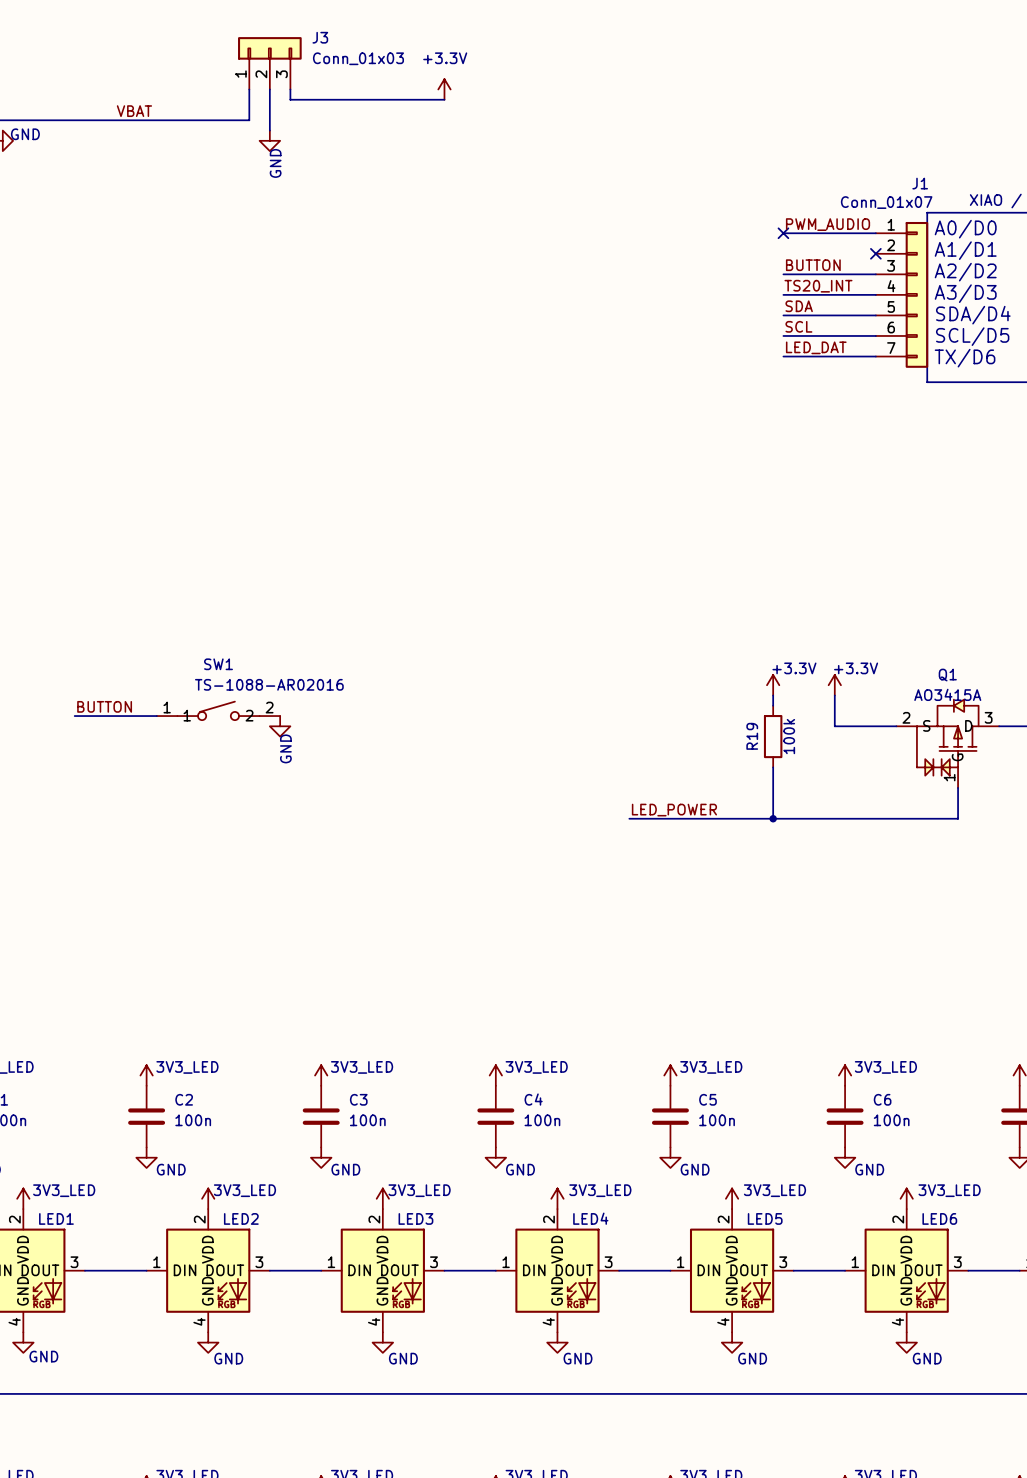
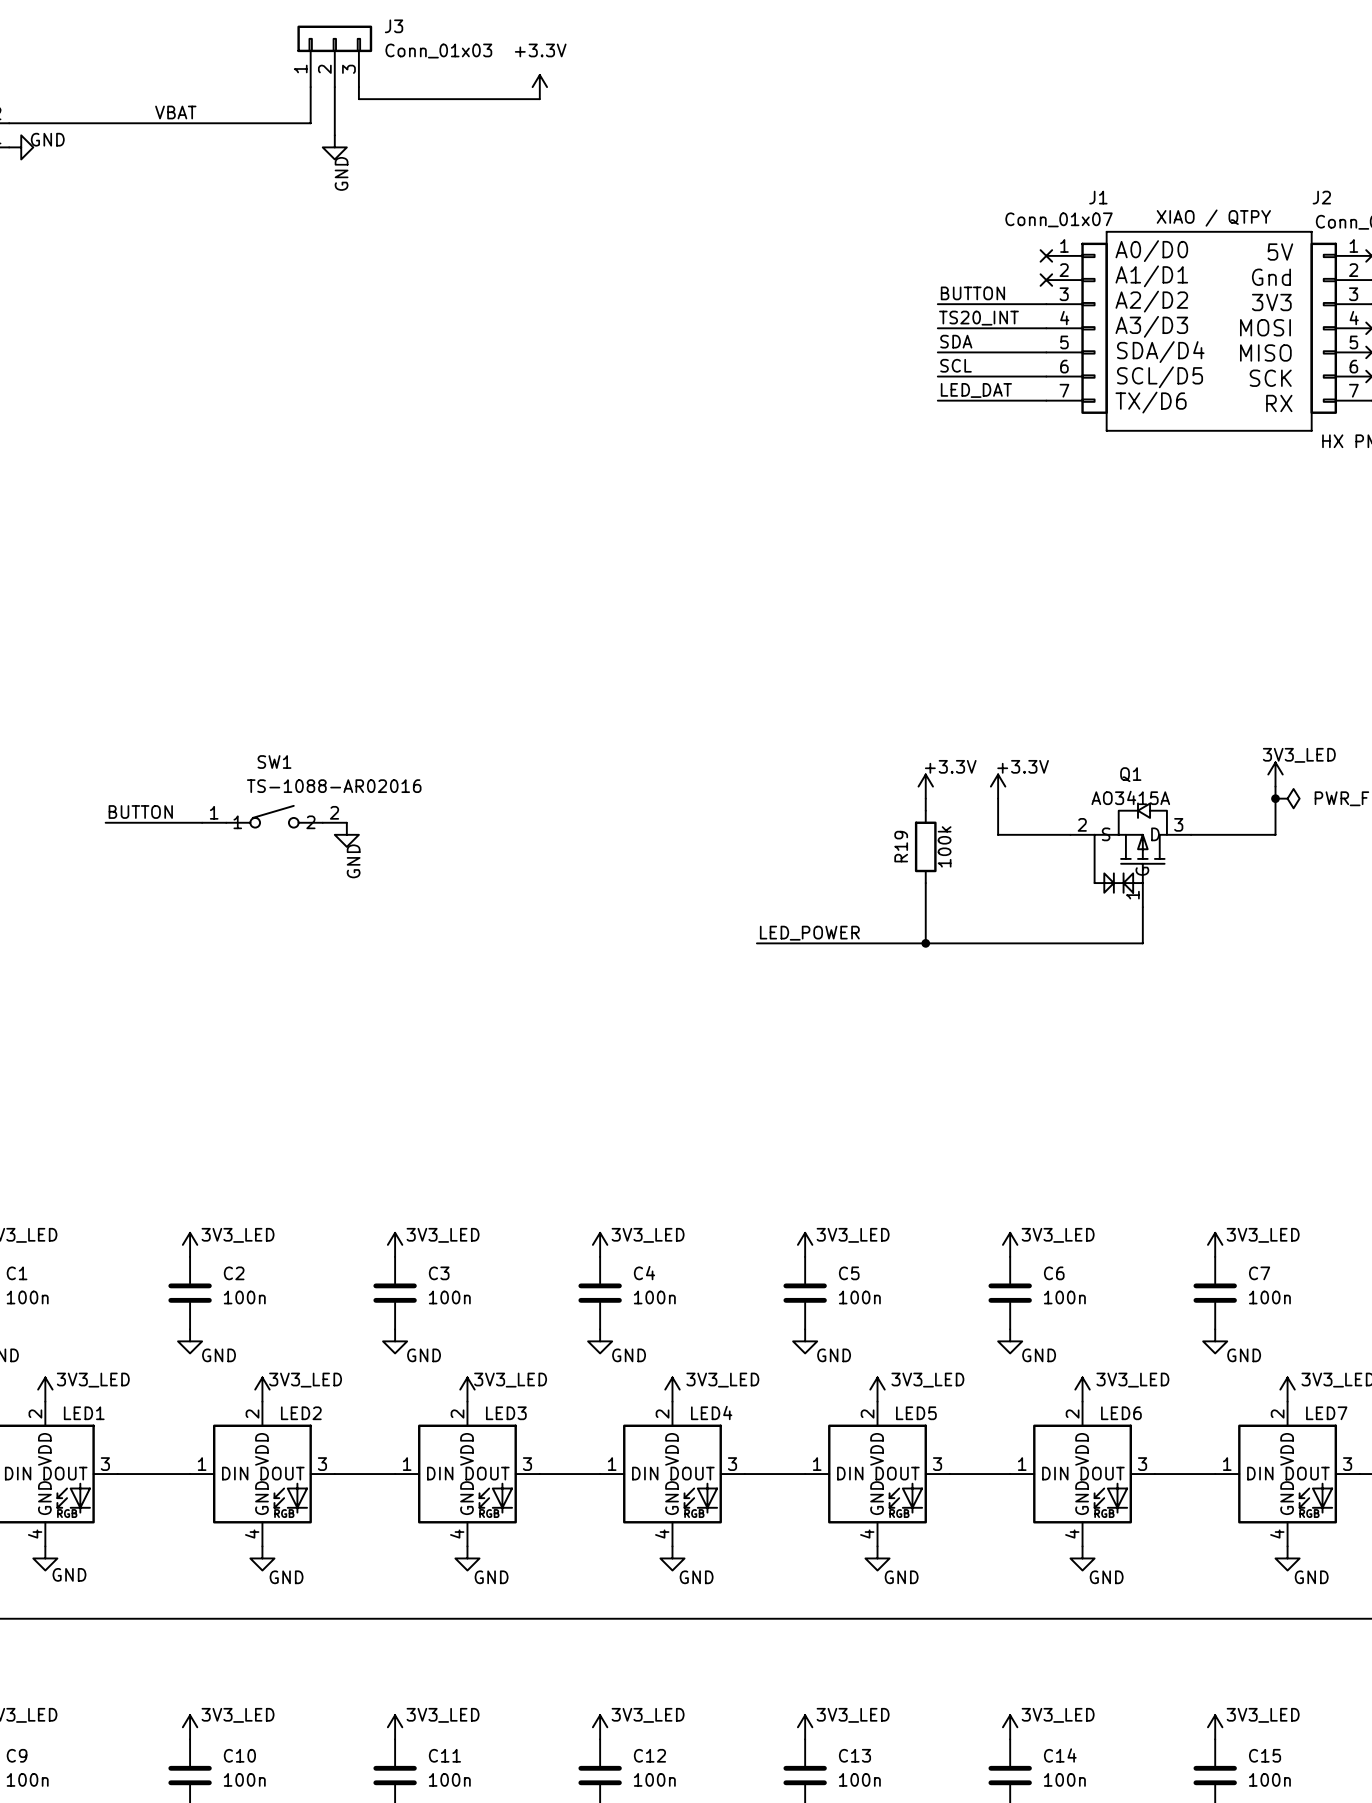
label: PWM_AUDIO (828, 224) -> none
wire: (783, 233) (875, 233) -> none
no-connect mark: (783, 233) -> none
no-connect mark: none -> (1046, 255)

